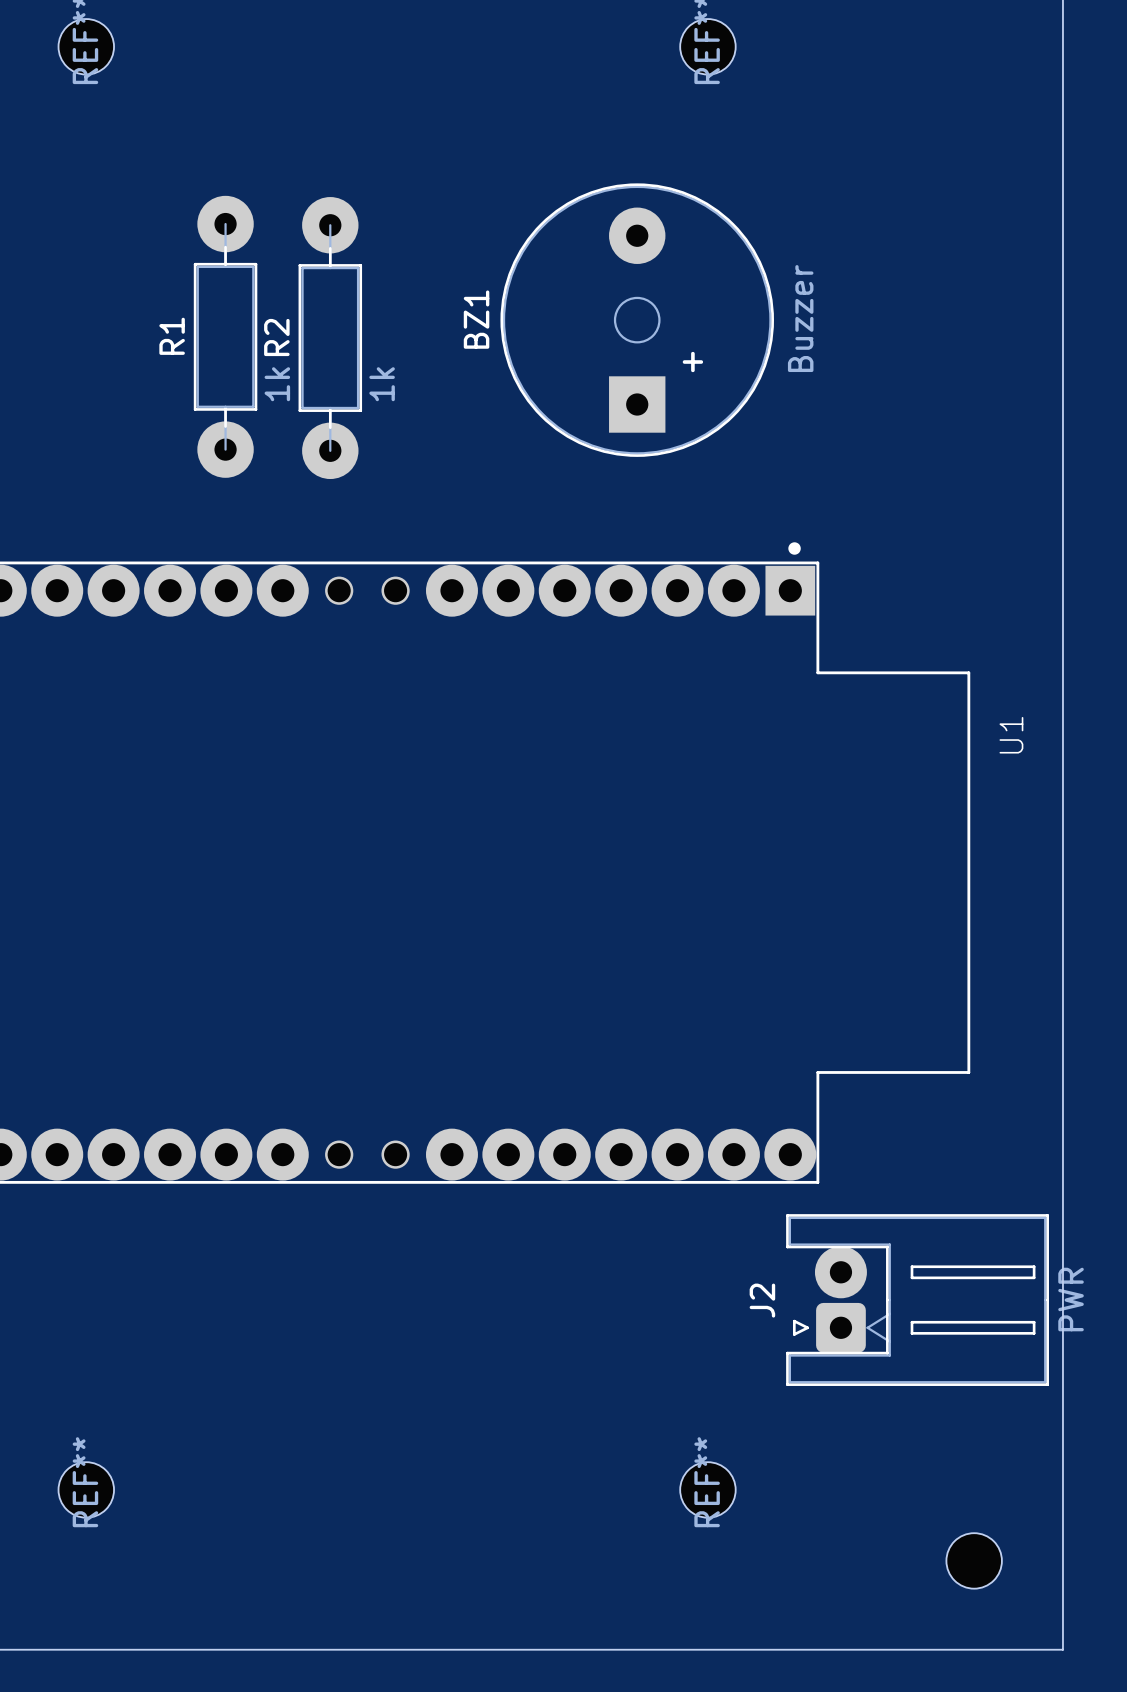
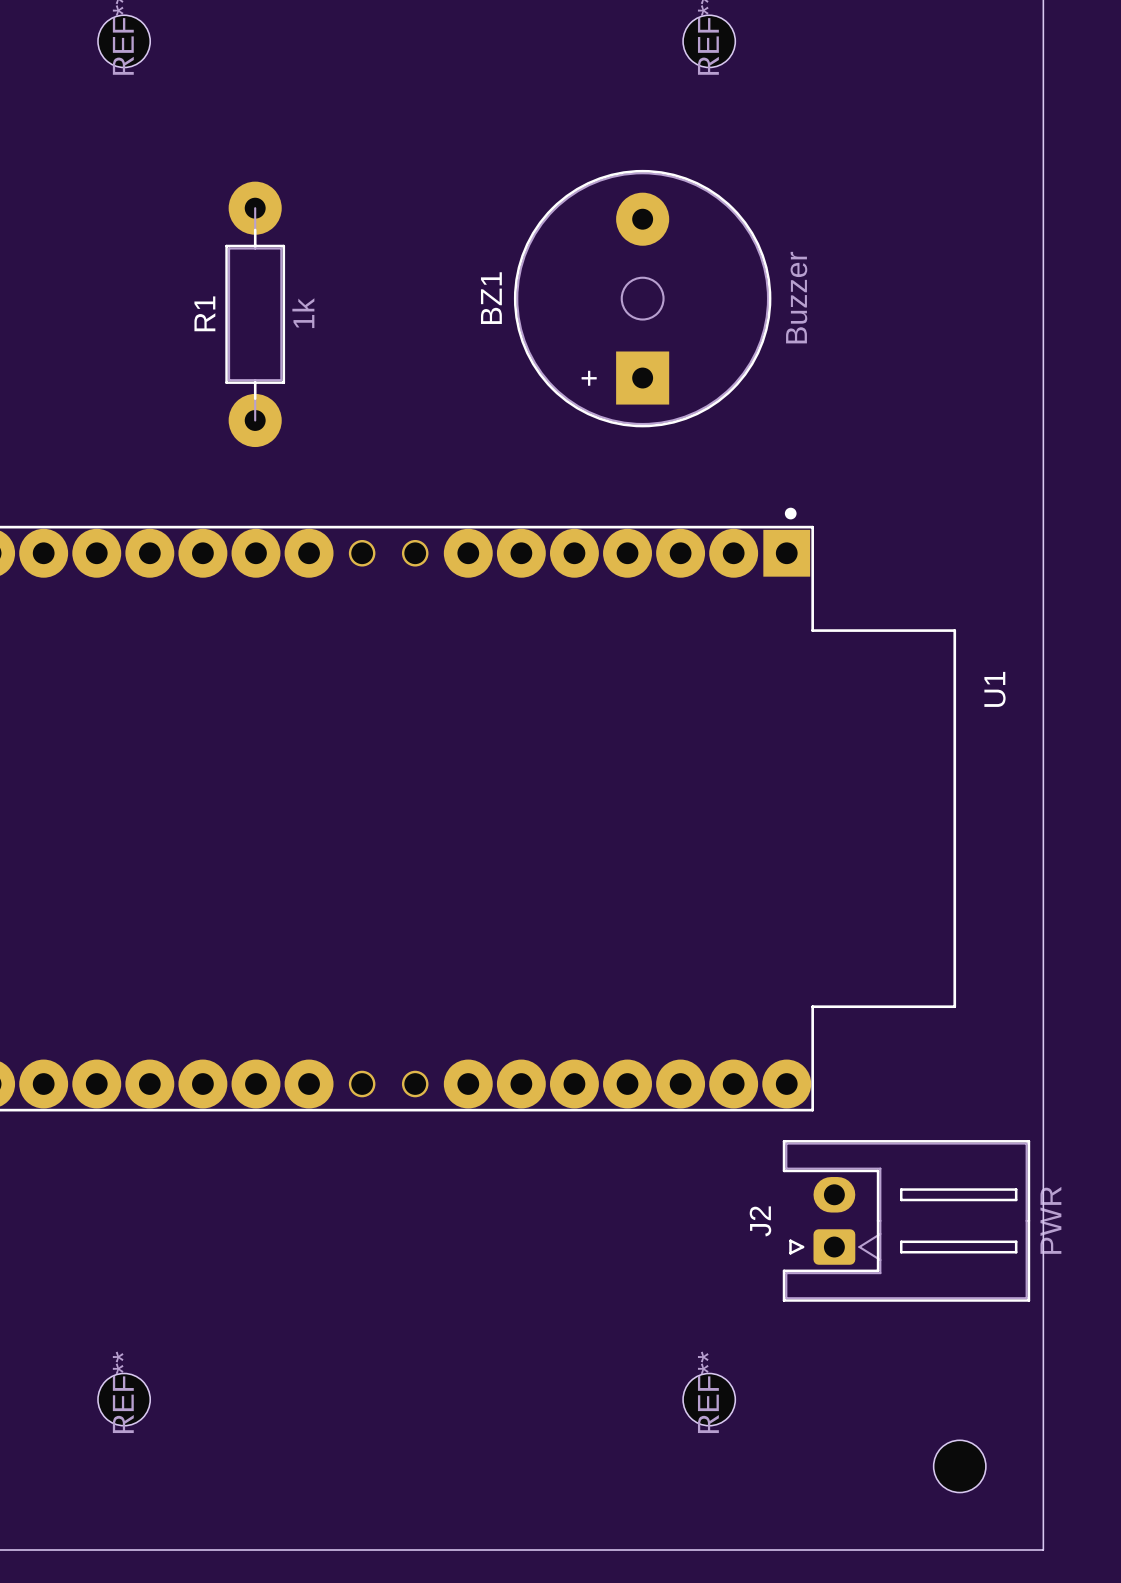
BZ1 footprint: [500, 183, 774, 457] -> [513, 169, 772, 428]
R2: 1k (330, 338) -> none
R1 value position: 1k (277, 384) -> 1k (303, 313)
J2 footprint: [786, 1214, 1049, 1386] -> [782, 1140, 1031, 1302]

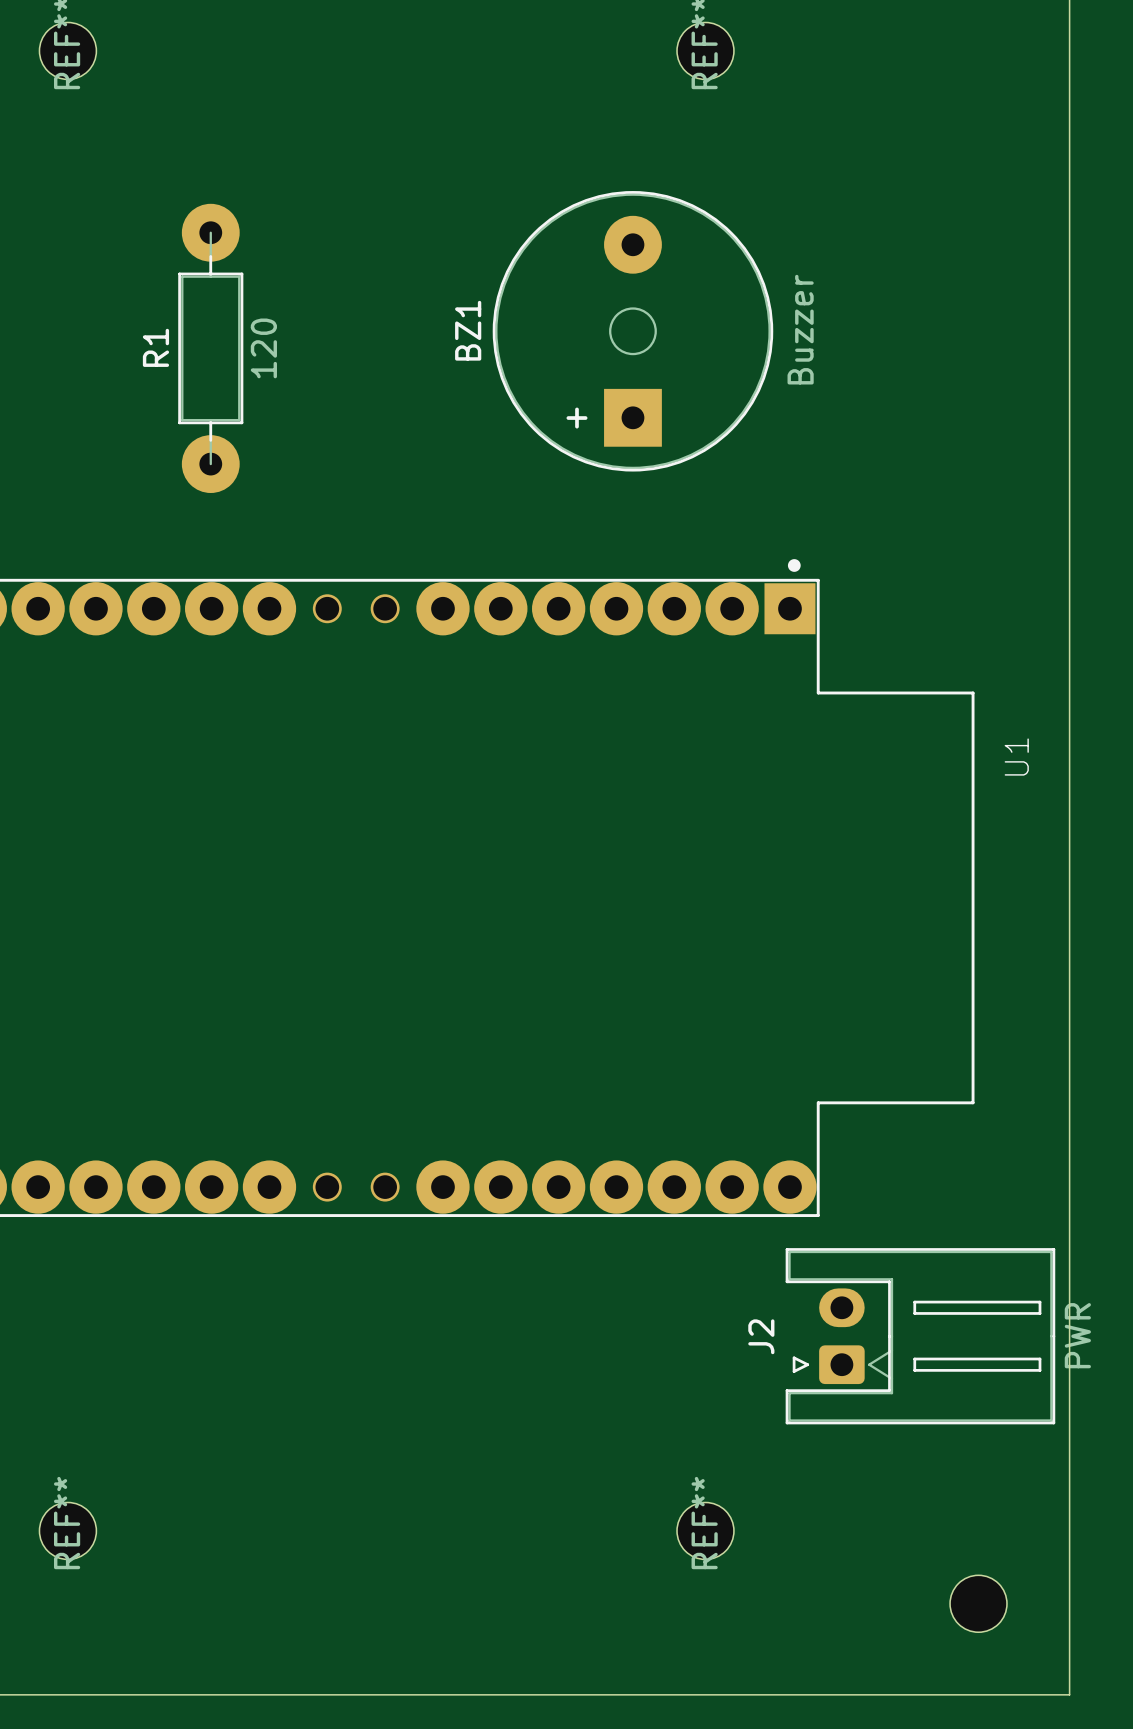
R1 value: 1k (303, 313) -> 120 (263, 348)

